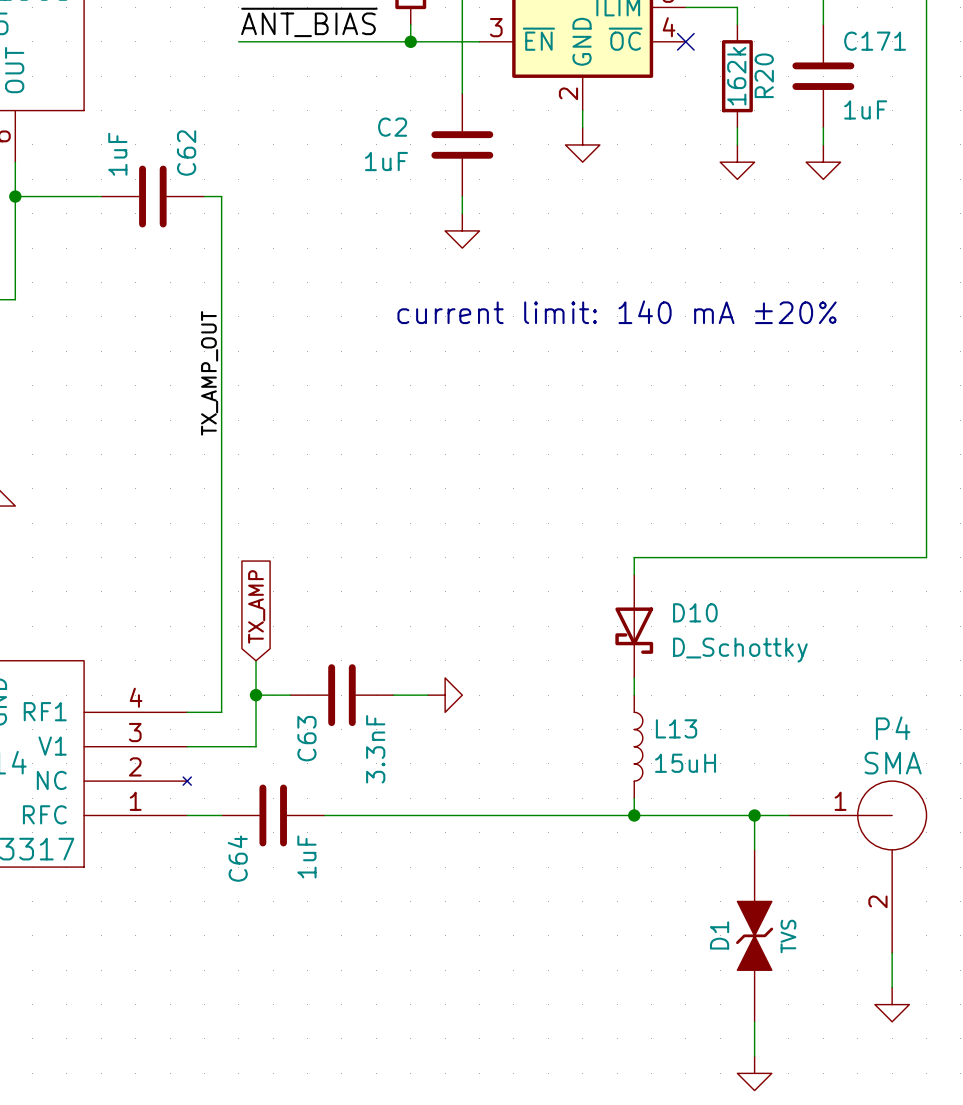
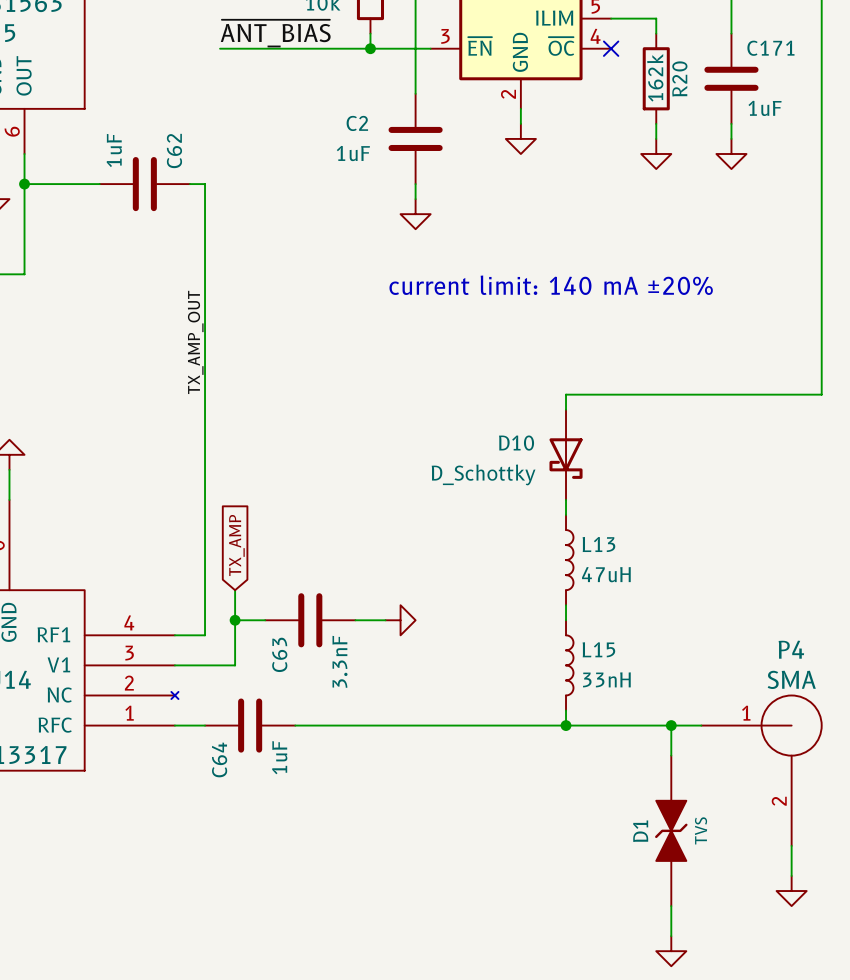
wire: (926, 437) (926, 557) (634, 557) -> (821, 394) (566, 394) (566, 409)
D10 name position: D10 (695, 612) -> D10 (516, 443)
D10 position: (634, 626) -> (566, 454)
L13: none -> 47uH (569, 560)
D10 value position: D_Schottky (740, 650) -> D_Schottky (483, 474)
L13 name: L13 (676, 728) -> L15 (598, 649)
L13 value: 15uH (685, 763) -> 33nH (606, 679)

